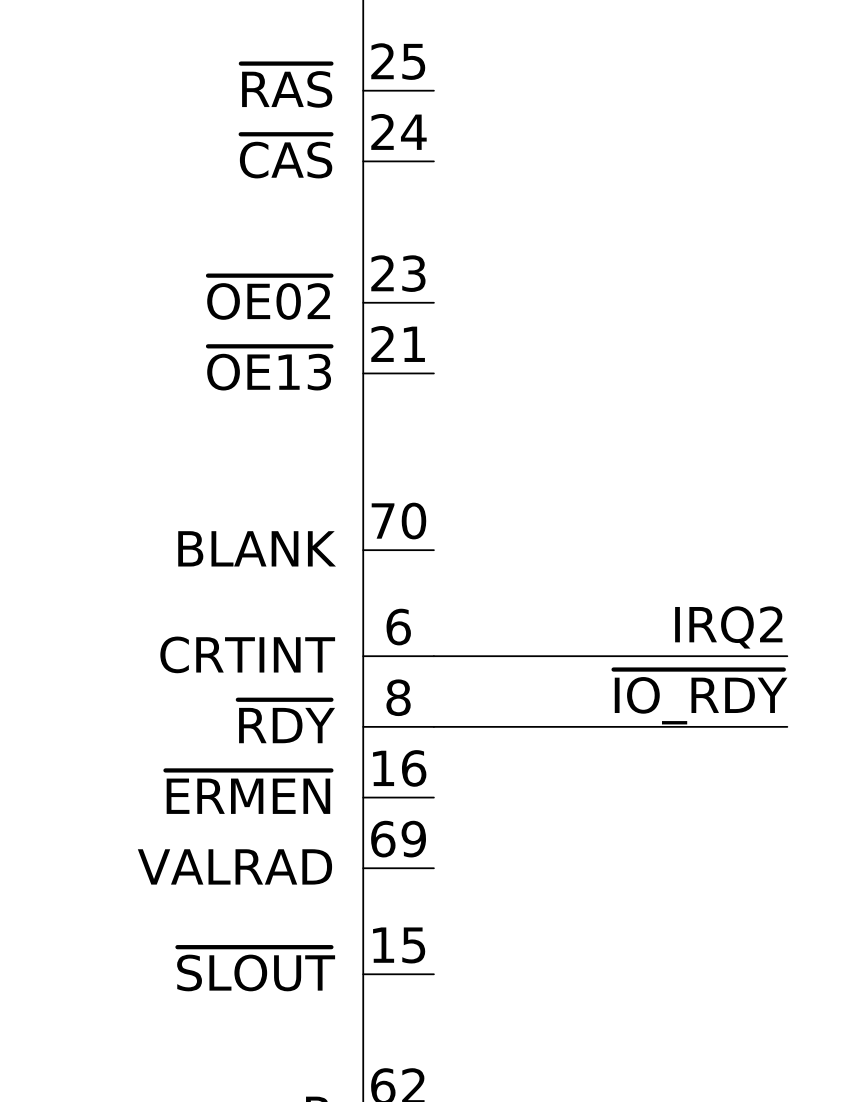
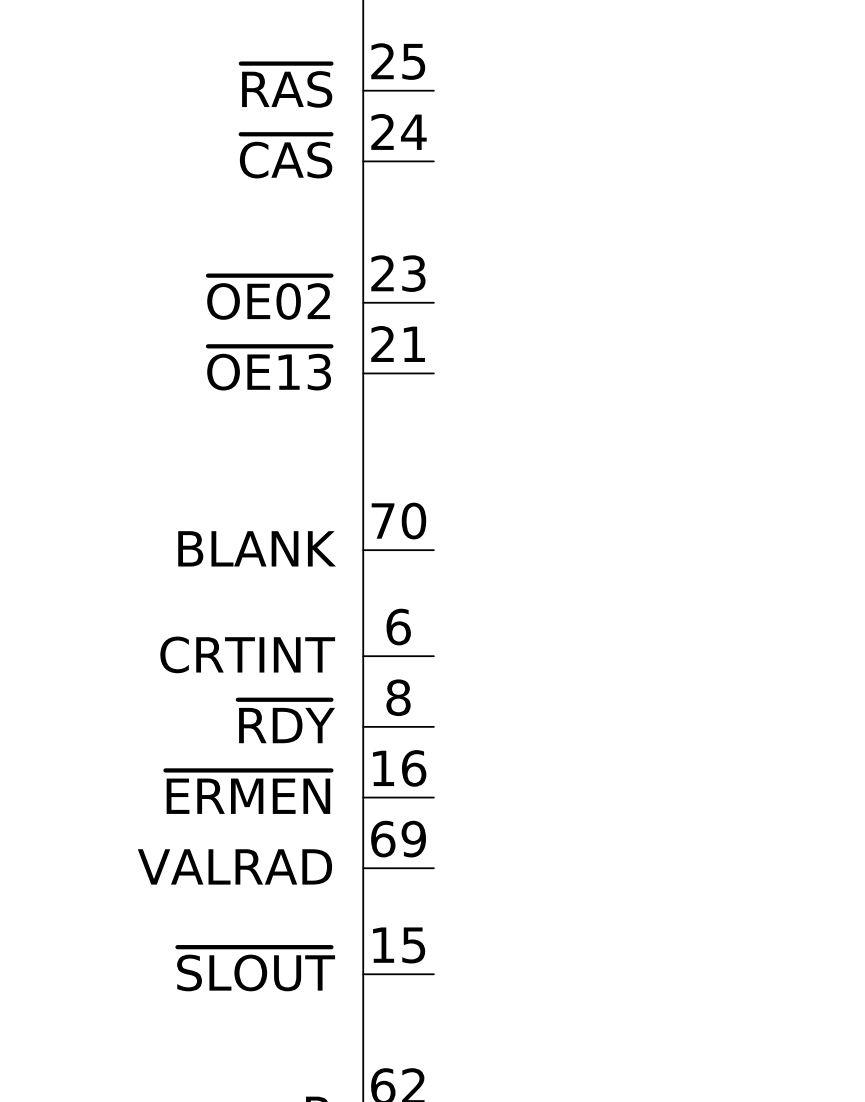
label: IRQ2 (728, 627) -> none
wire: (433, 656) (787, 656) -> none
label: ~{IO_RDY} (700, 696) -> none
wire: (433, 726) (787, 726) -> none

